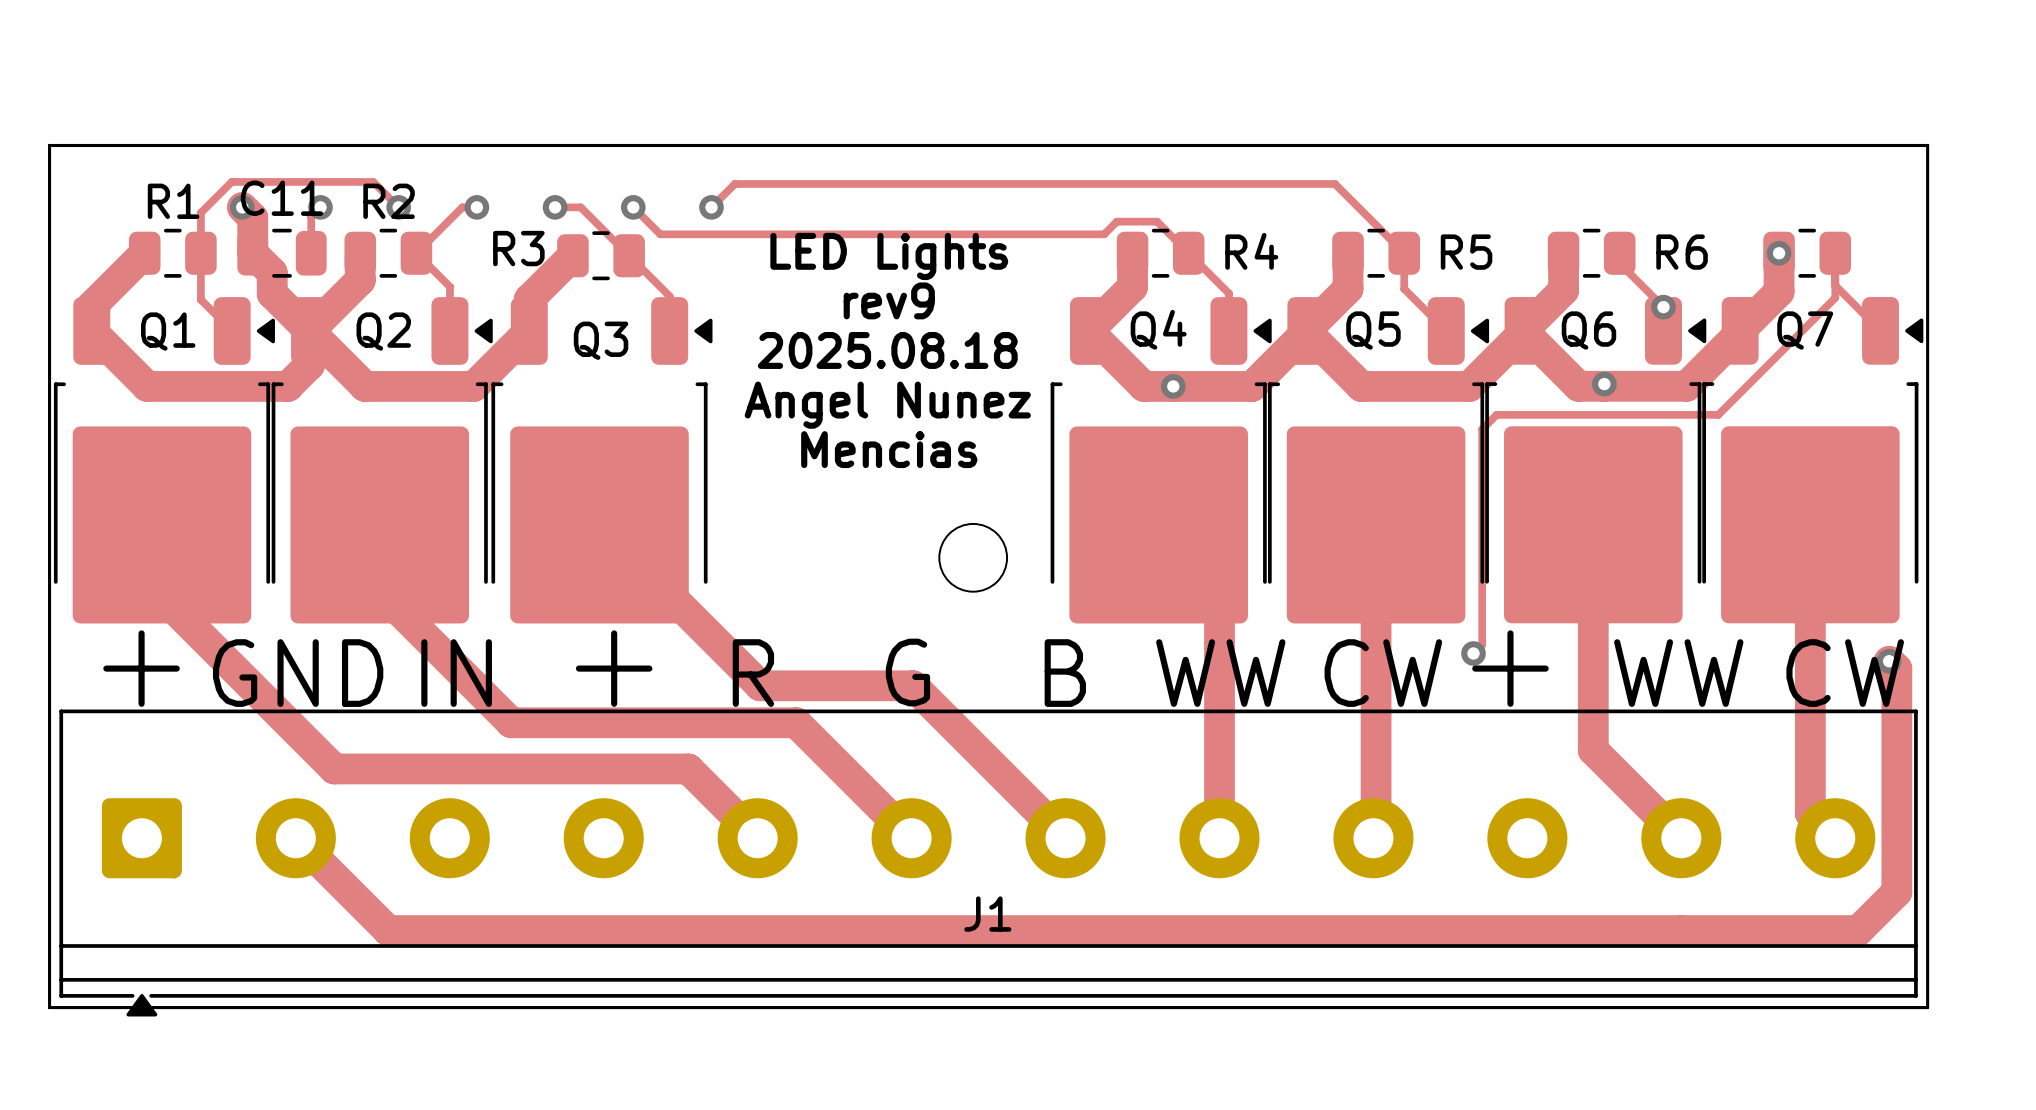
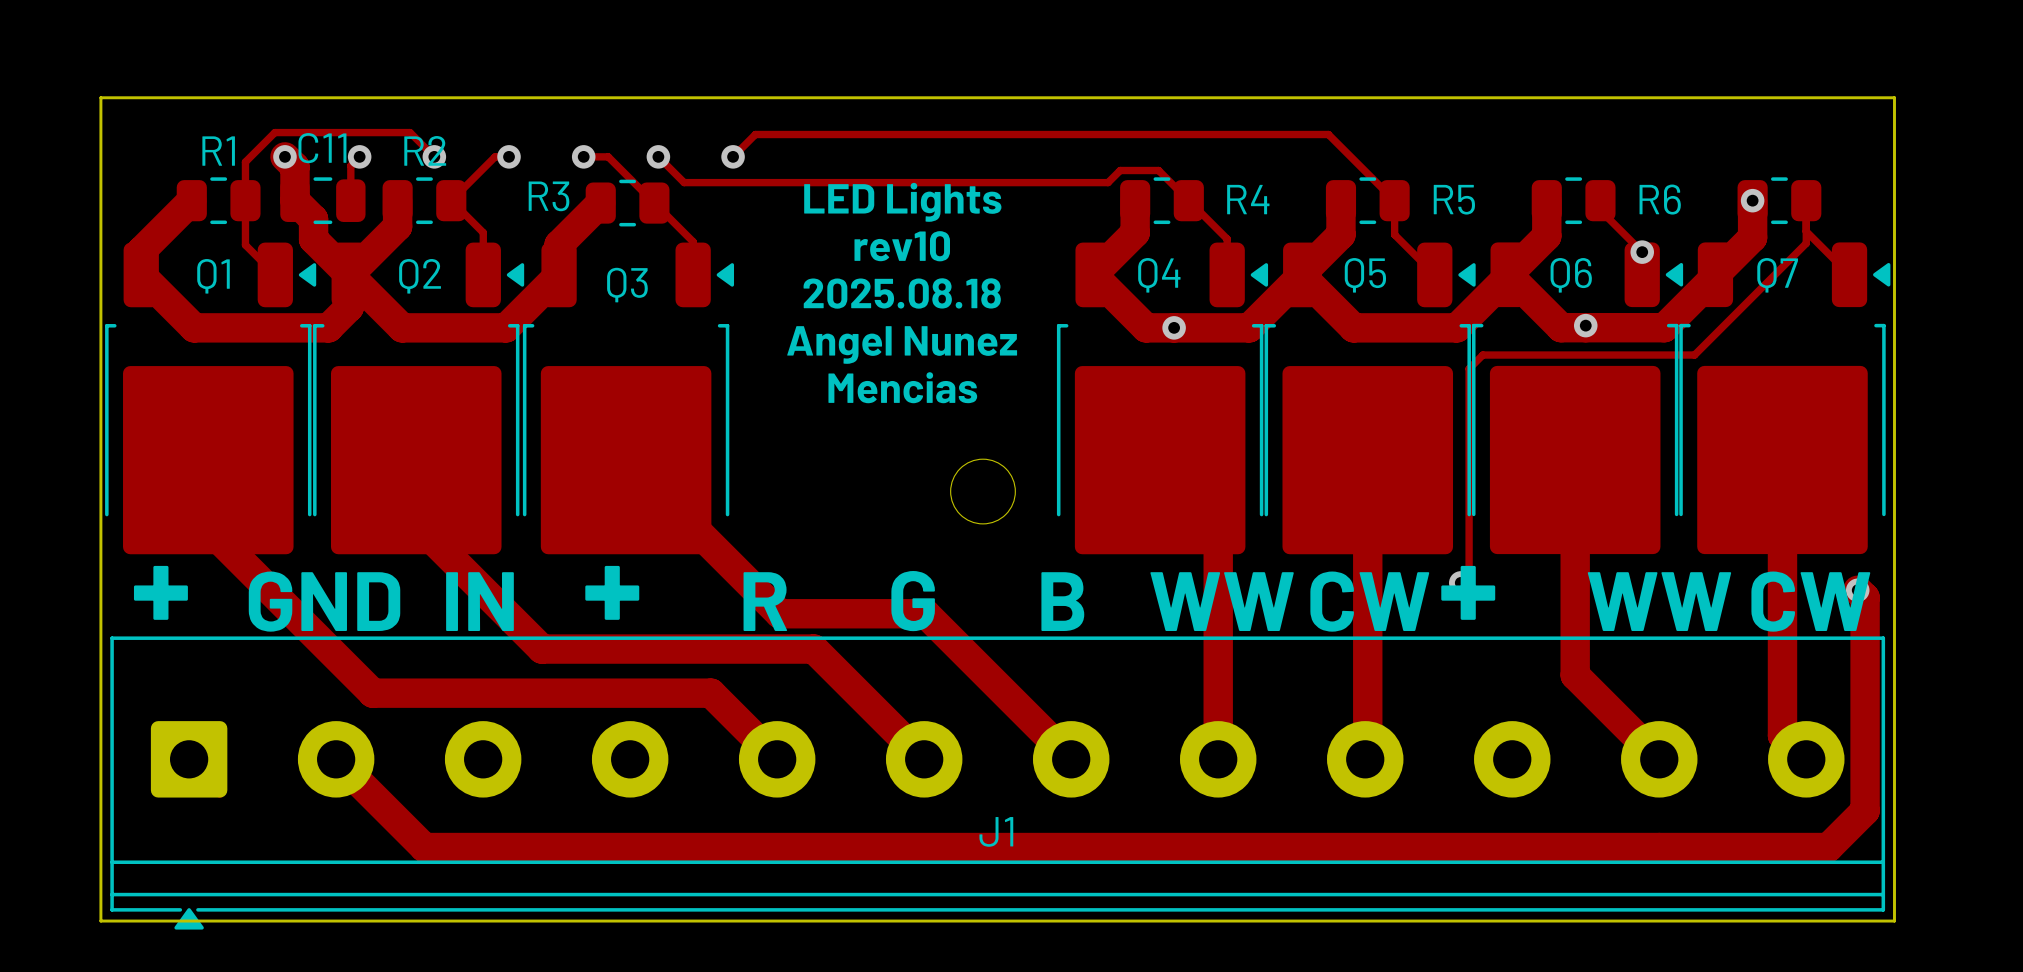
text: rev9 (889, 300) -> rev10 (902, 246)

